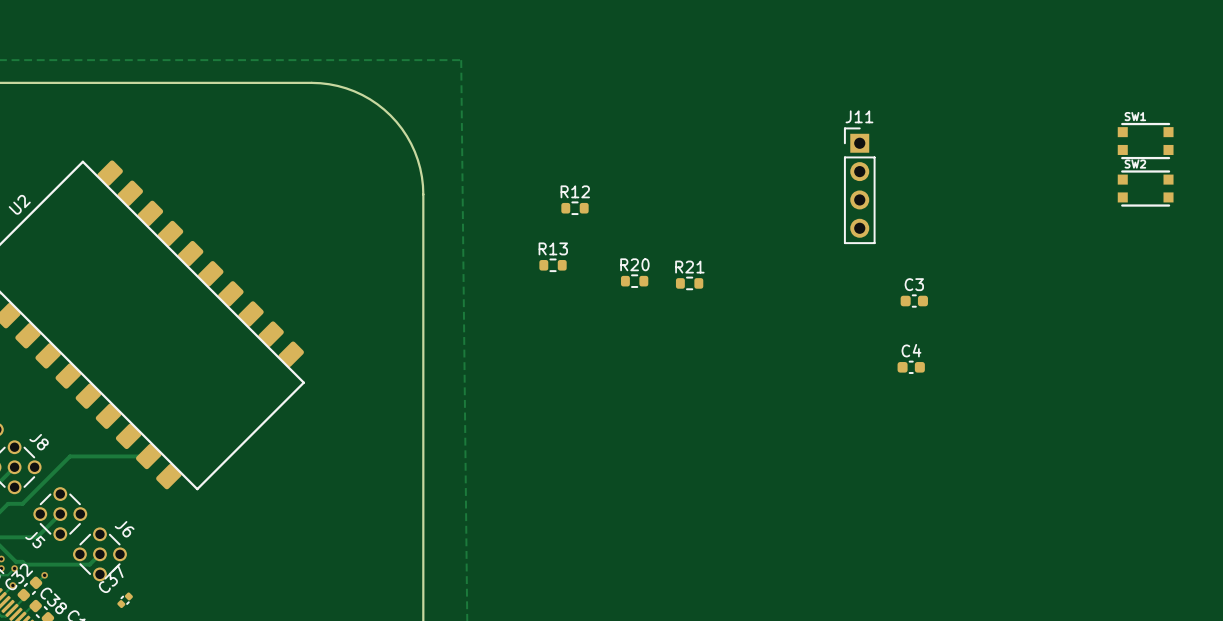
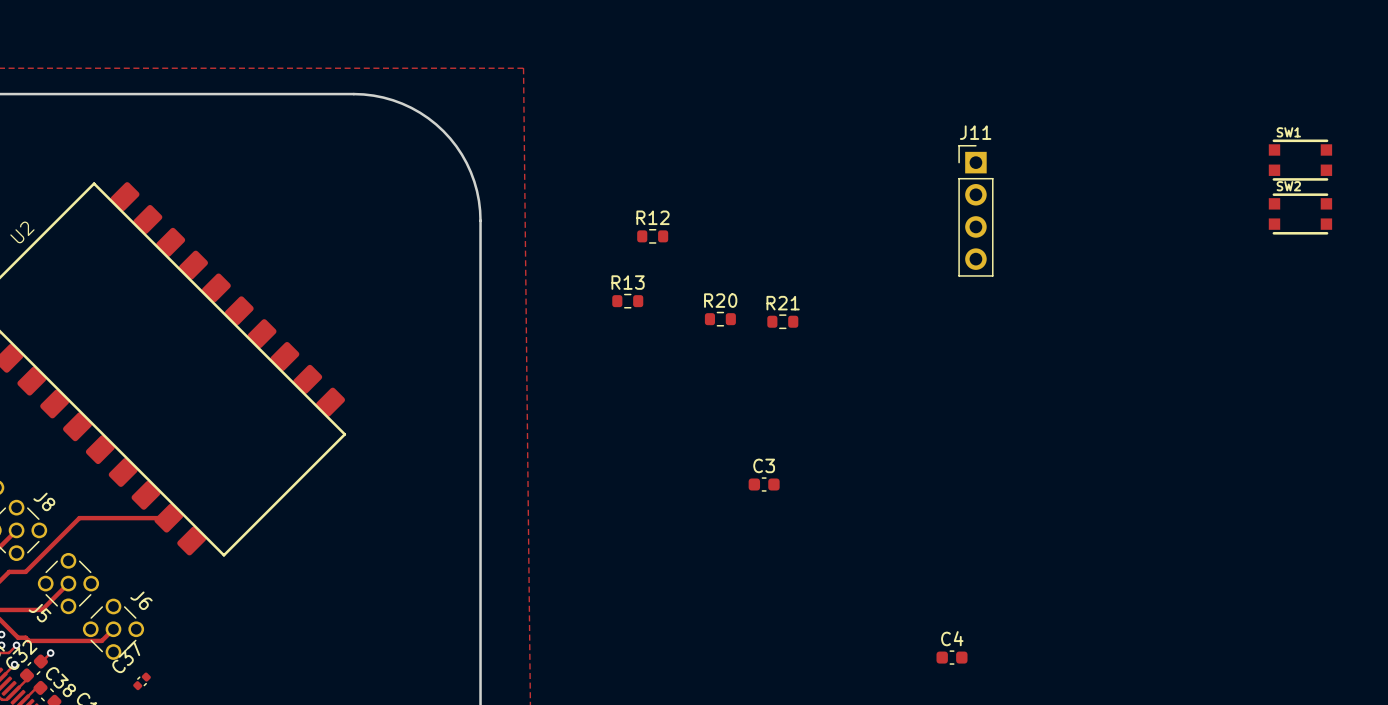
C3 position: (914, 301) -> (764, 484)
C4 position: (911, 367) -> (952, 657)

